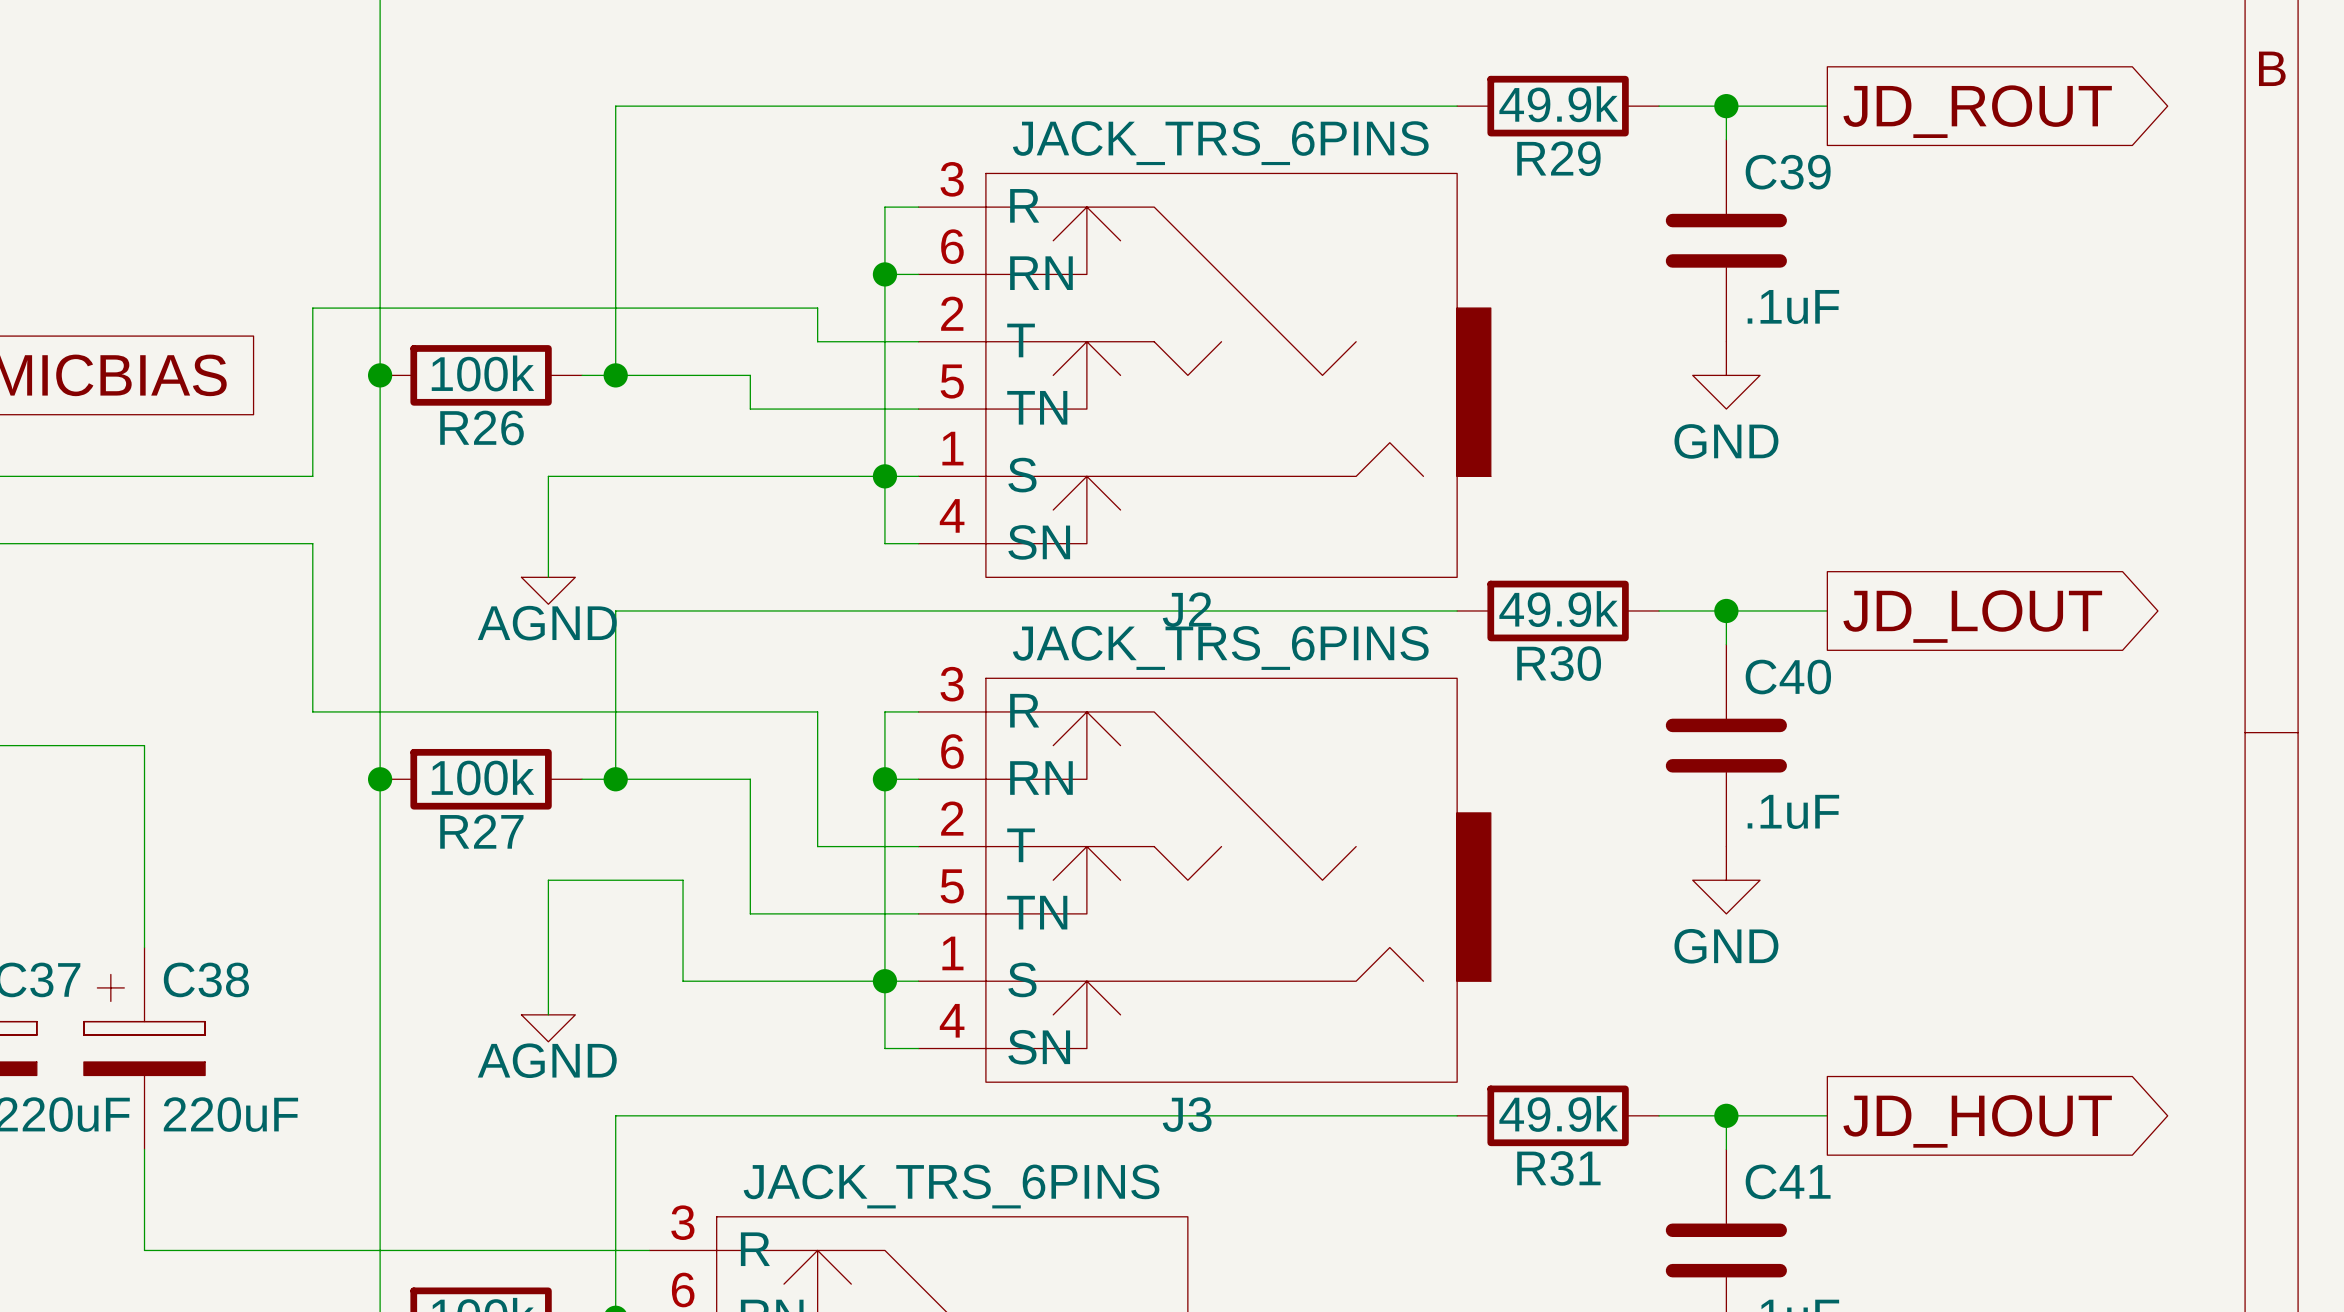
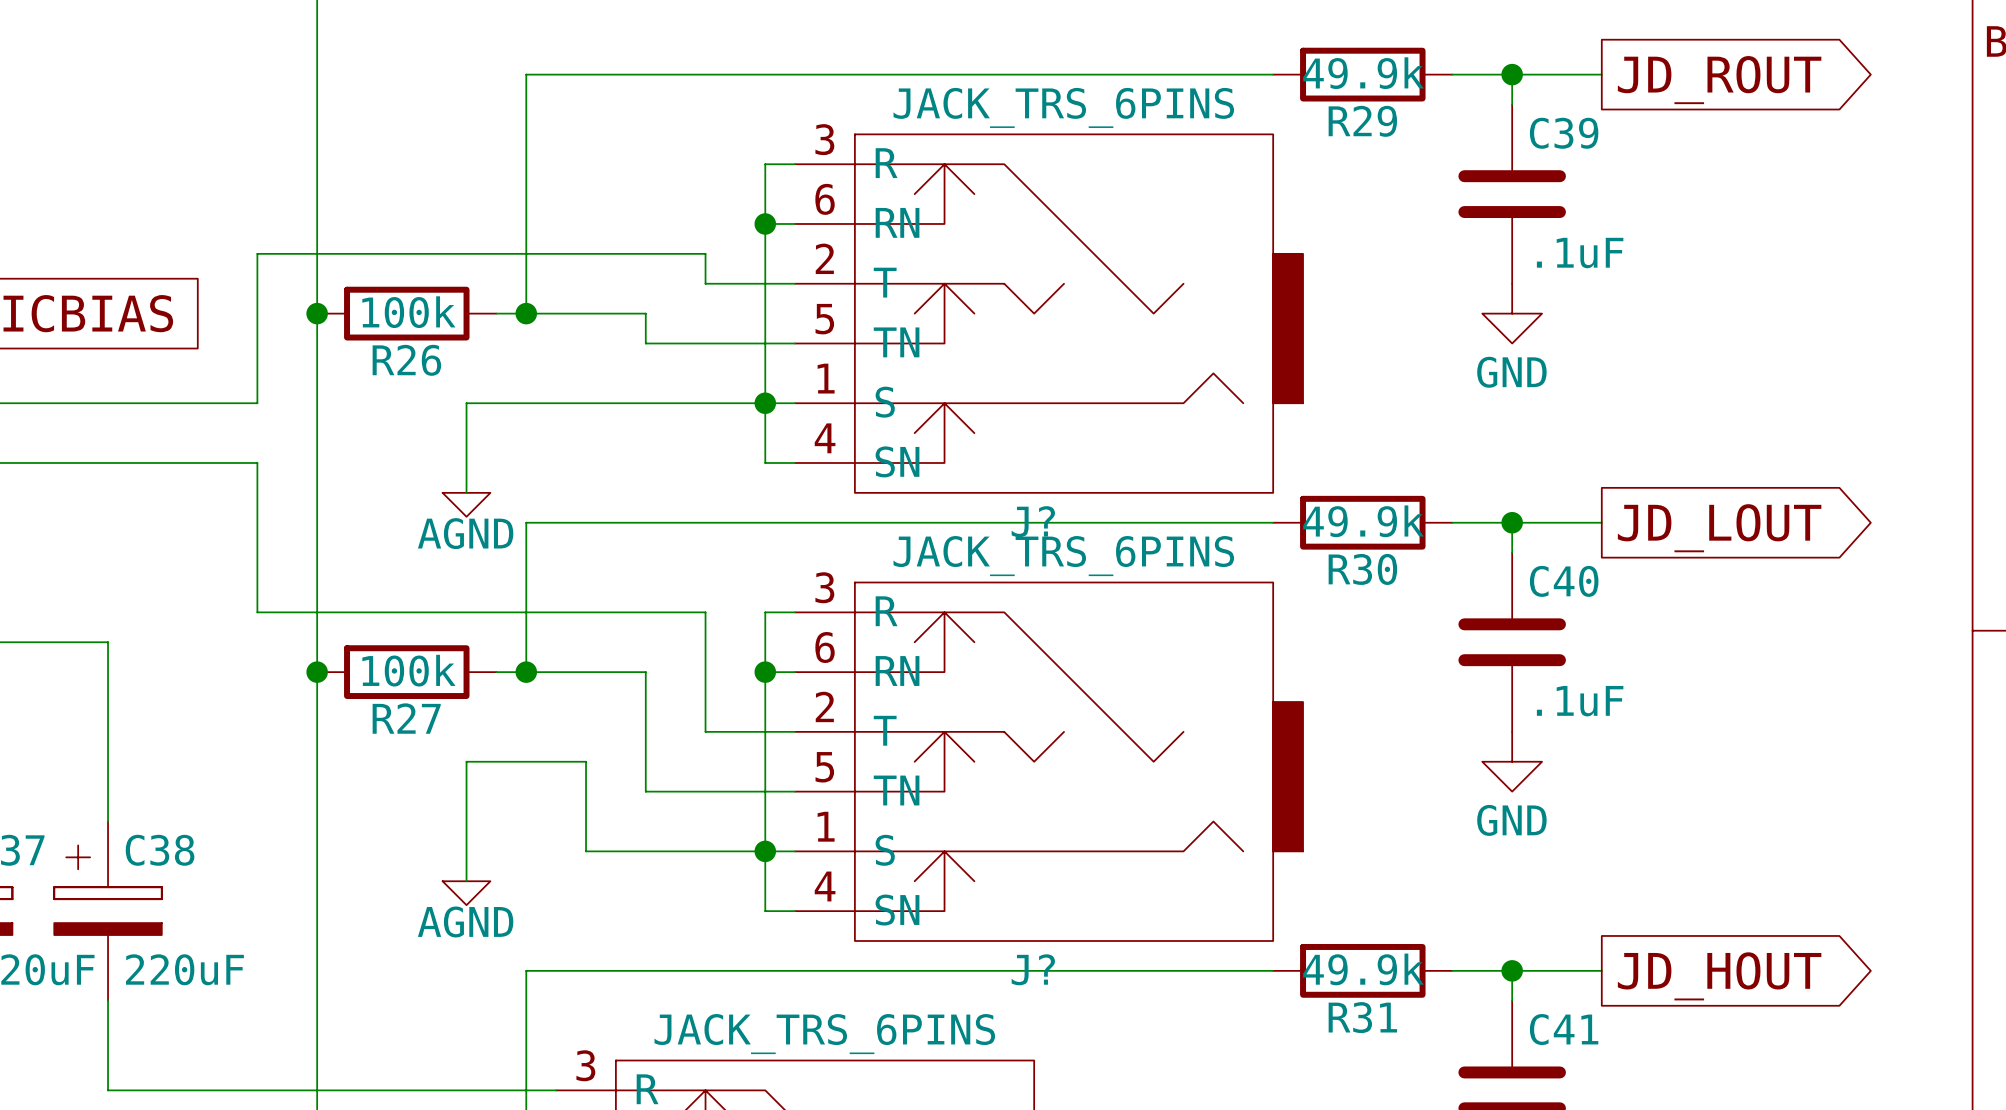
J2 name: J2 (1187, 609) -> J? (1033, 521)
J3 name: J3 (1187, 1114) -> J? (1033, 969)

